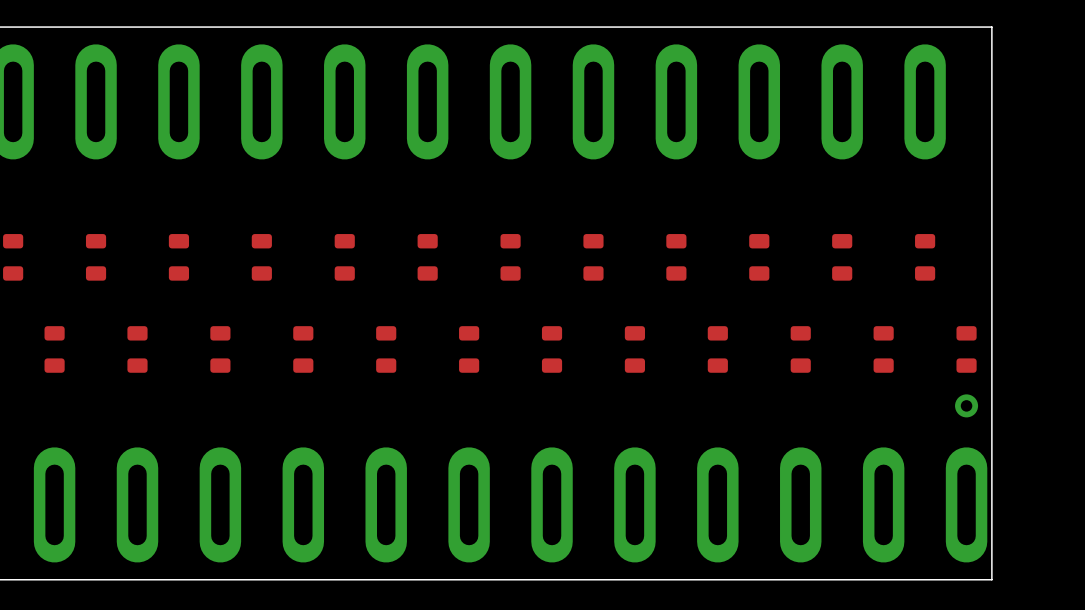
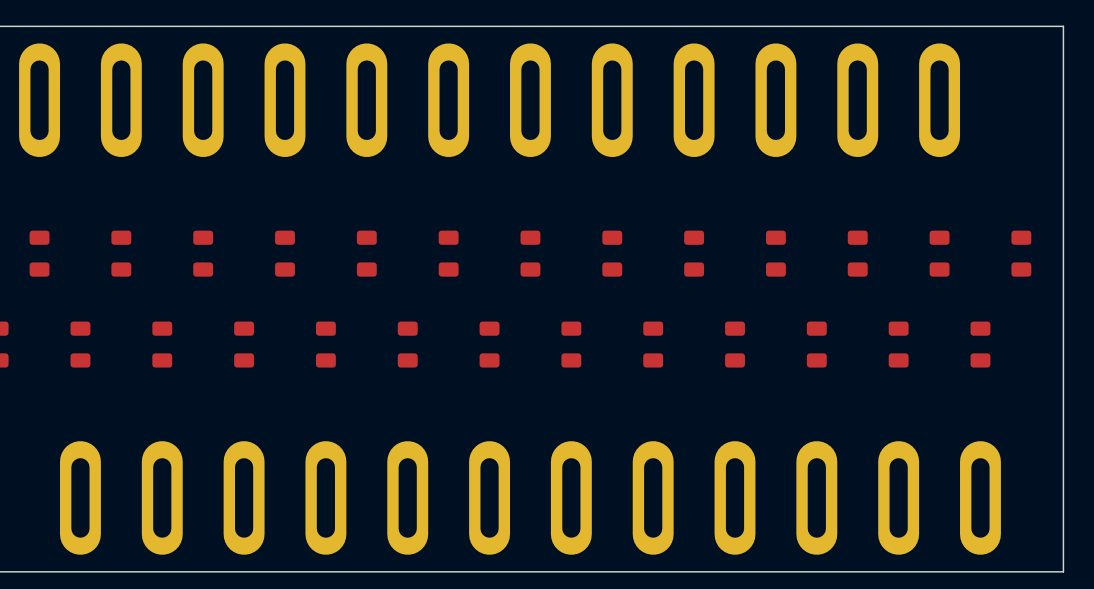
board edge: (991, 27) (991, 579) -> (1005, 26) (1063, 26) (1063, 571) (1005, 571)
part: none -> (1021, 253)
part: (966, 405) -> none

